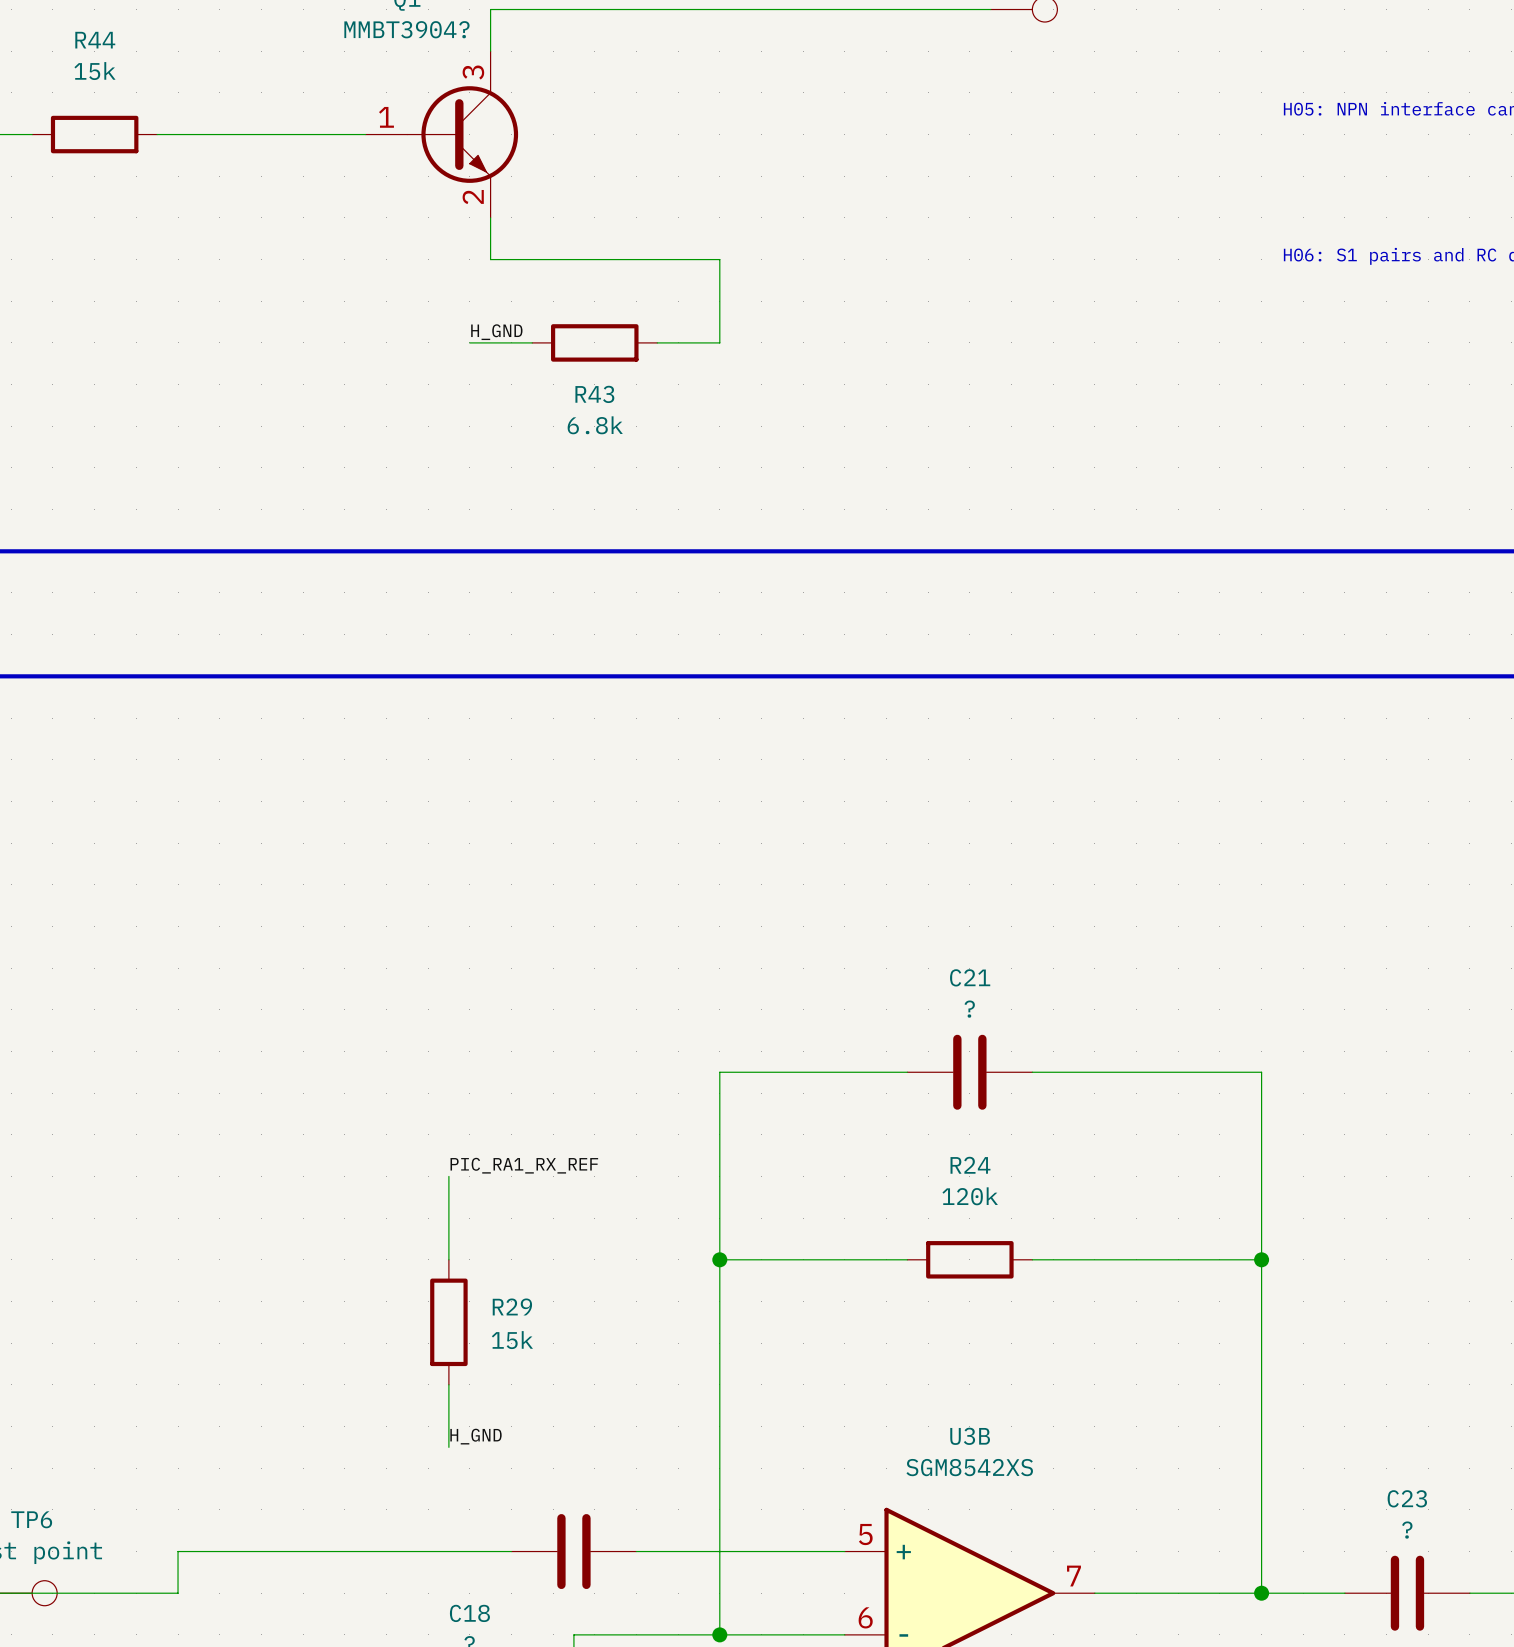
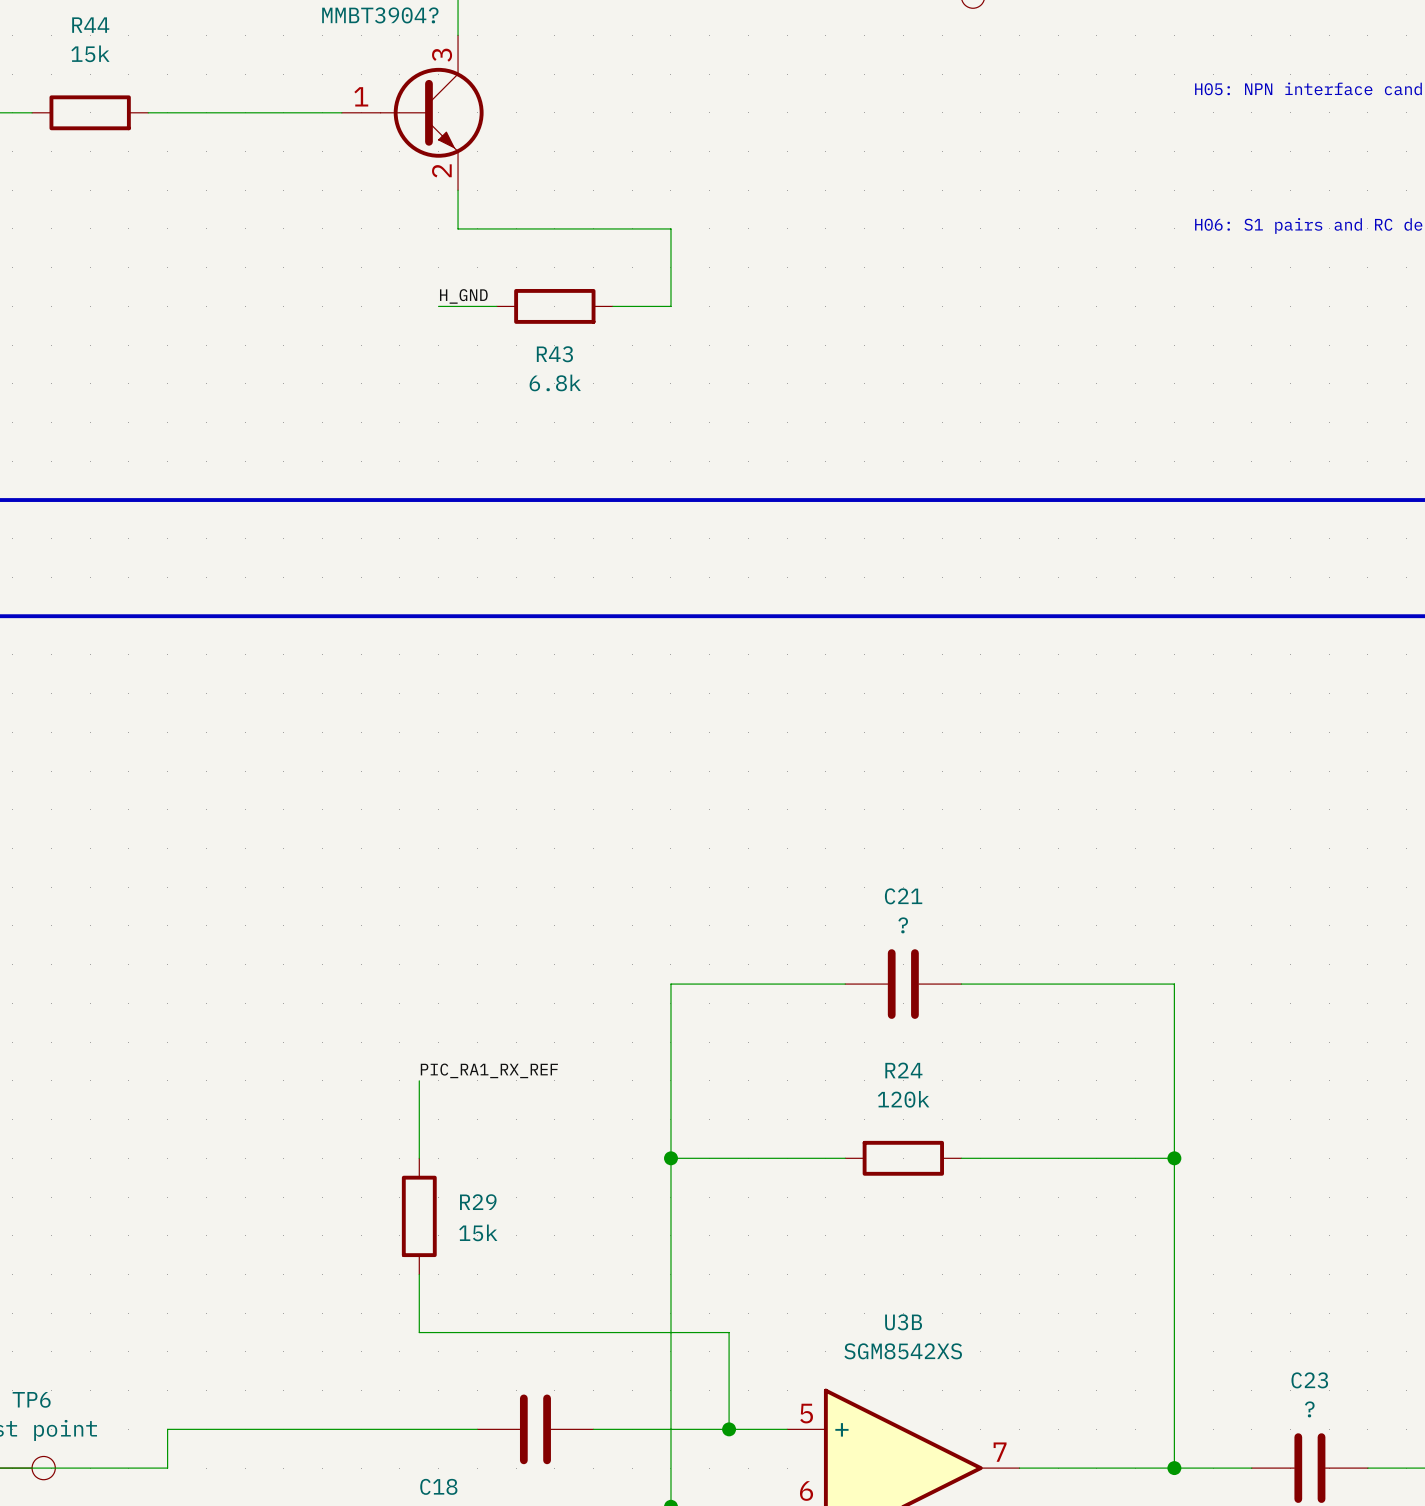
label: H_GND (475, 1436) -> none
wire: none -> (419, 1332) (729, 1332) (729, 1429)
junction: none -> (729, 1429)

